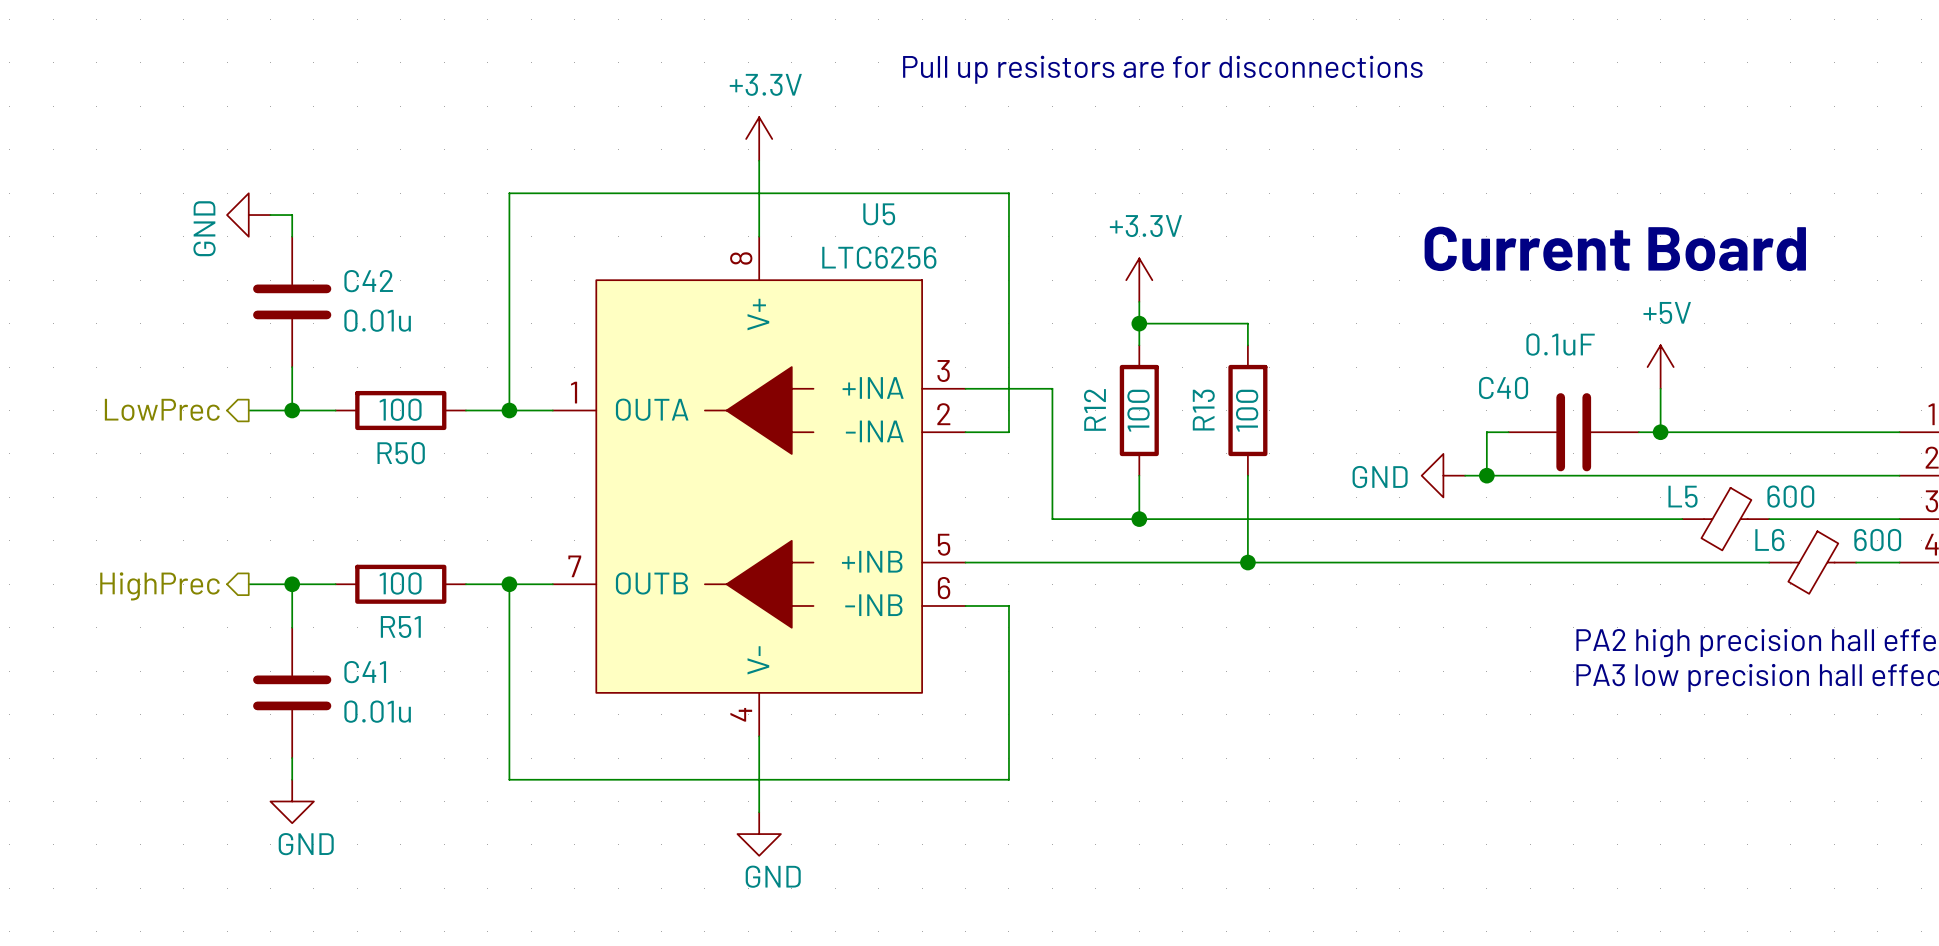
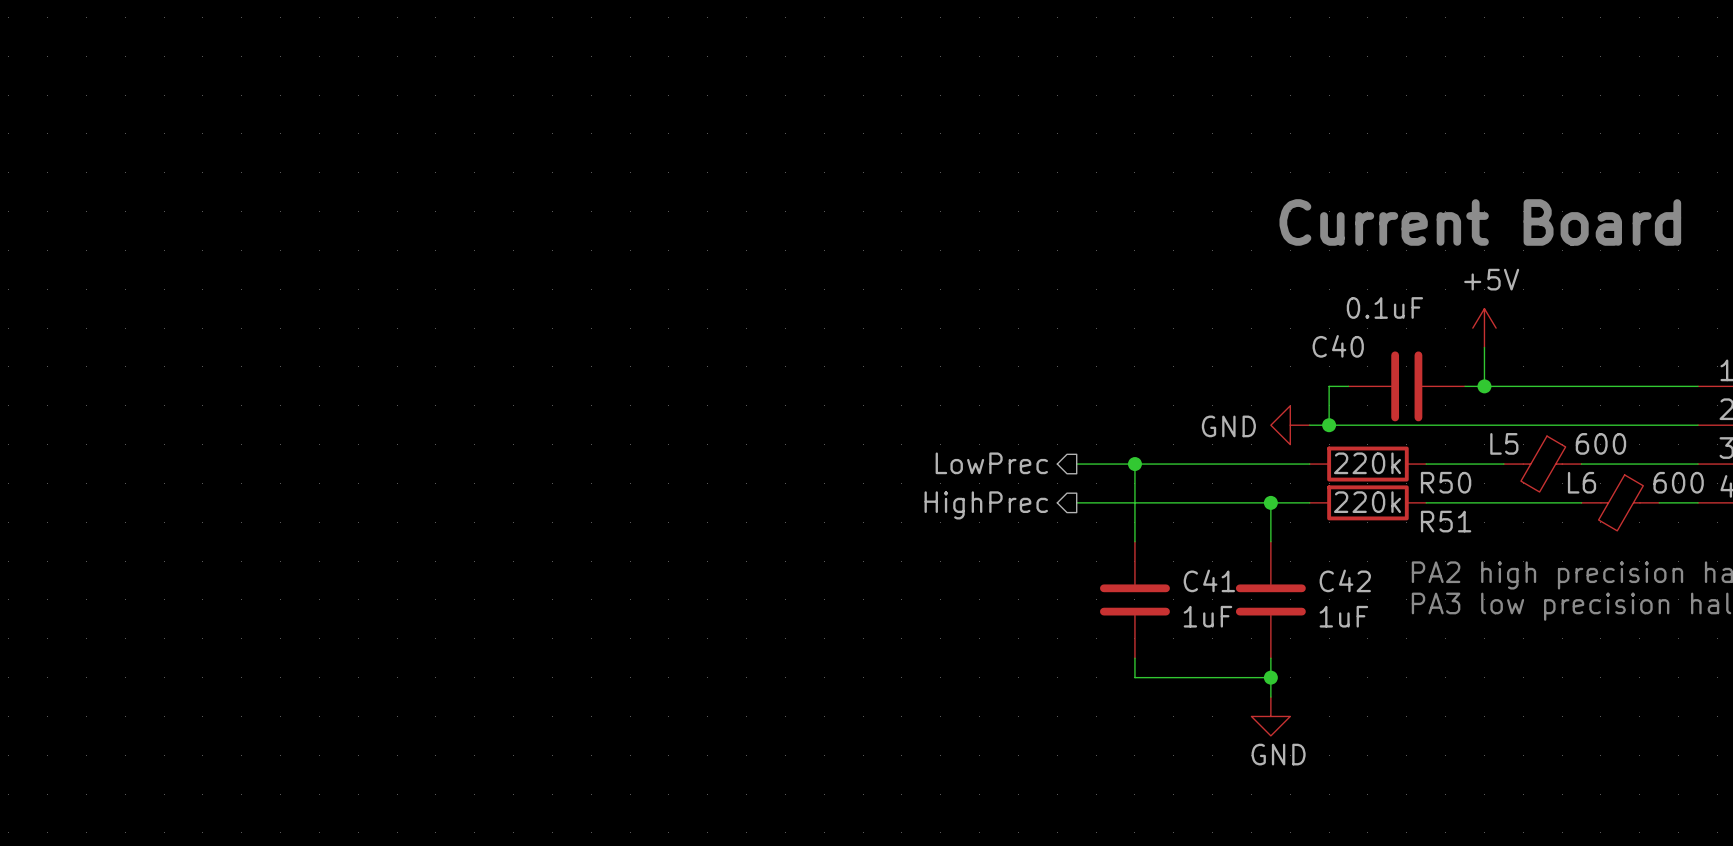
text: Pull up resistors are for disconnections (1162, 69) -> none
power symbol: +3.3V (759, 138) -> none
wire: (759, 160) (759, 236) -> none
power symbol: GND (248, 215) -> none
wire: (270, 215) (292, 215) (292, 236) -> none
power symbol: +3.3V (1139, 280) -> none
C42 position: (292, 301) -> (1270, 599)
wire: (1139, 301) (1139, 345) -> (1270, 502) (1270, 541)
C42 value: 0.01u (377, 320) -> 1uF (1343, 616)
wire: (1139, 323) (1247, 323) (1247, 345) -> none
junction: (1139, 323) -> none
wire: (292, 367) (292, 410) -> none
wire: (965, 388) (1052, 388) (1052, 519) (1204, 519) -> none
hierarchical label: LowPrec (162, 409) -> none
R50 value: 100 (400, 409) -> 220k (1367, 463)
wire: (248, 410) (335, 410) -> none
junction: (292, 410) -> none
R50 position: (400, 410) -> (1367, 464)
wire: (465, 410) (552, 410) -> none
wire: (509, 410) (509, 193) (1008, 193) (1008, 432) (965, 432) -> none
junction: (509, 410) -> none
R12: 100 (1139, 410) -> none
R13: 100 (1247, 410) -> none
R50 name position: R50 (401, 453) -> R50 (1446, 482)
wire: (1139, 475) (1139, 519) -> (1270, 658) (1270, 697)
wire: (1247, 475) (1247, 562) -> (1134, 464) (1134, 541)
U5: LTC6256 (759, 486) -> none
hierarchical label: none -> LowPrec (991, 463)
junction: (1139, 519) -> none
wire: (1465, 519) (1595, 519) -> none
wire: (965, 562) (1204, 562) -> none
junction position: (1247, 562) -> (1134, 464)
junction: none -> (1270, 502)
wire: (1465, 562) (1595, 562) -> none
hierarchical label: none -> HighPrec (986, 505)
R51 value: 100 (400, 583) -> 220k (1367, 502)
wire: (248, 584) (335, 584) -> none
wire: (292, 584) (292, 627) -> none
junction: (292, 584) -> none
R51 position: (400, 584) -> (1367, 502)
wire: (465, 584) (552, 584) -> none
wire: (509, 584) (509, 779) (1008, 779) (1008, 605) (965, 605) -> none
junction: (509, 584) -> none
hierarchical label: HighPrec (159, 586) -> none
R51 name position: R51 (400, 627) -> R51 (1446, 521)
C41 position: (292, 692) -> (1134, 599)
C41 value: 0.01u (377, 711) -> 1uF (1207, 616)
wire: (759, 736) (759, 812) -> none
wire: none -> (1134, 658) (1134, 677) (1270, 677)
wire: (292, 758) (292, 779) -> none
junction: none -> (1270, 677)
power symbol: GND (292, 801) -> none
power symbol: none -> GND (1270, 716)
power symbol: GND (759, 834) -> none

